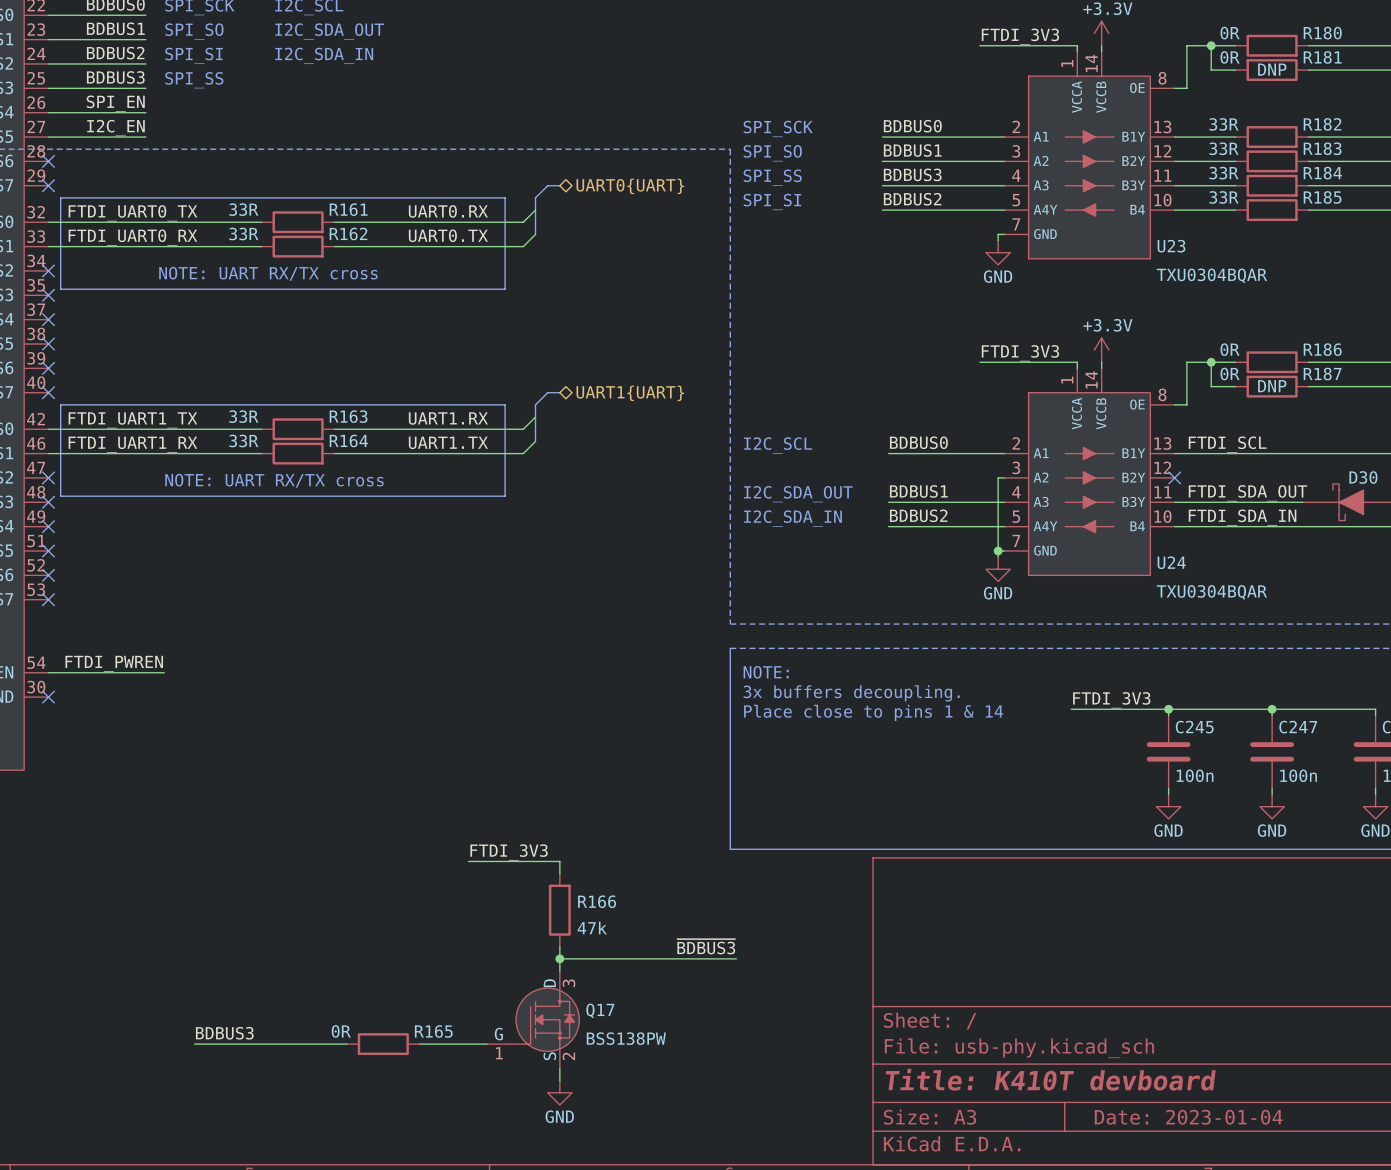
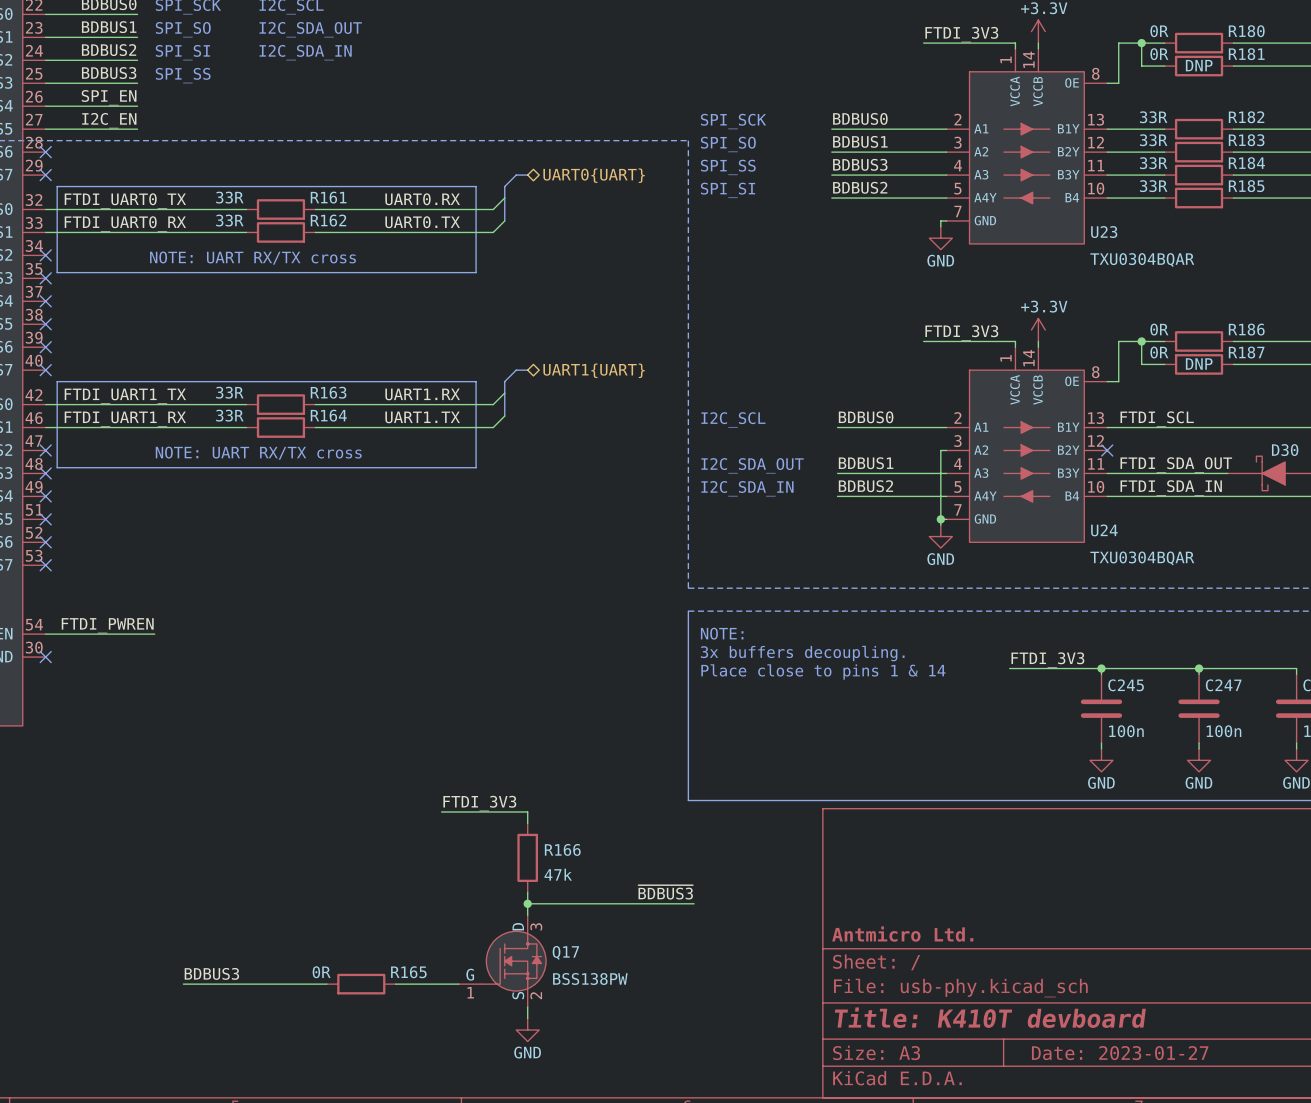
title block: none -> Antmicro Ltd. (902, 934)
title block: Date: 2023-01-04 (1188, 1117) -> Date: 2023-01-27 (1120, 1053)

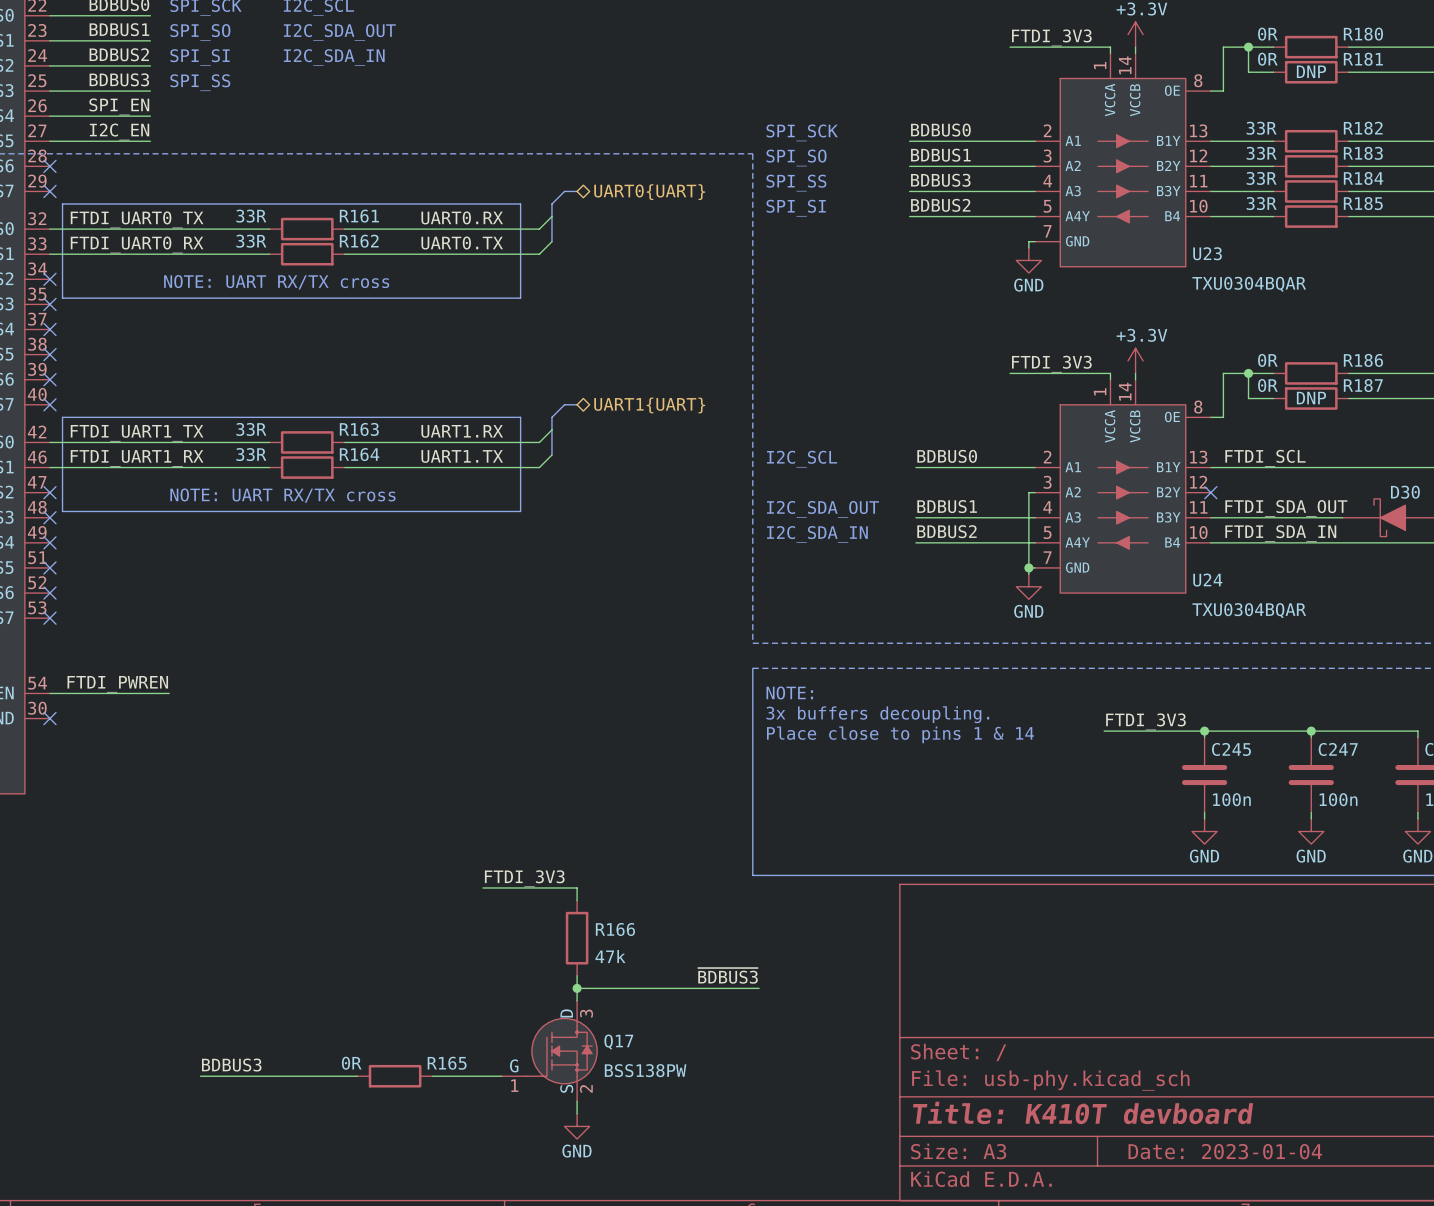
title block: Antmicro Ltd. (902, 934) -> none
title block: Date: 2023-01-27 (1120, 1053) -> Date: 2023-01-04 (1225, 1151)

